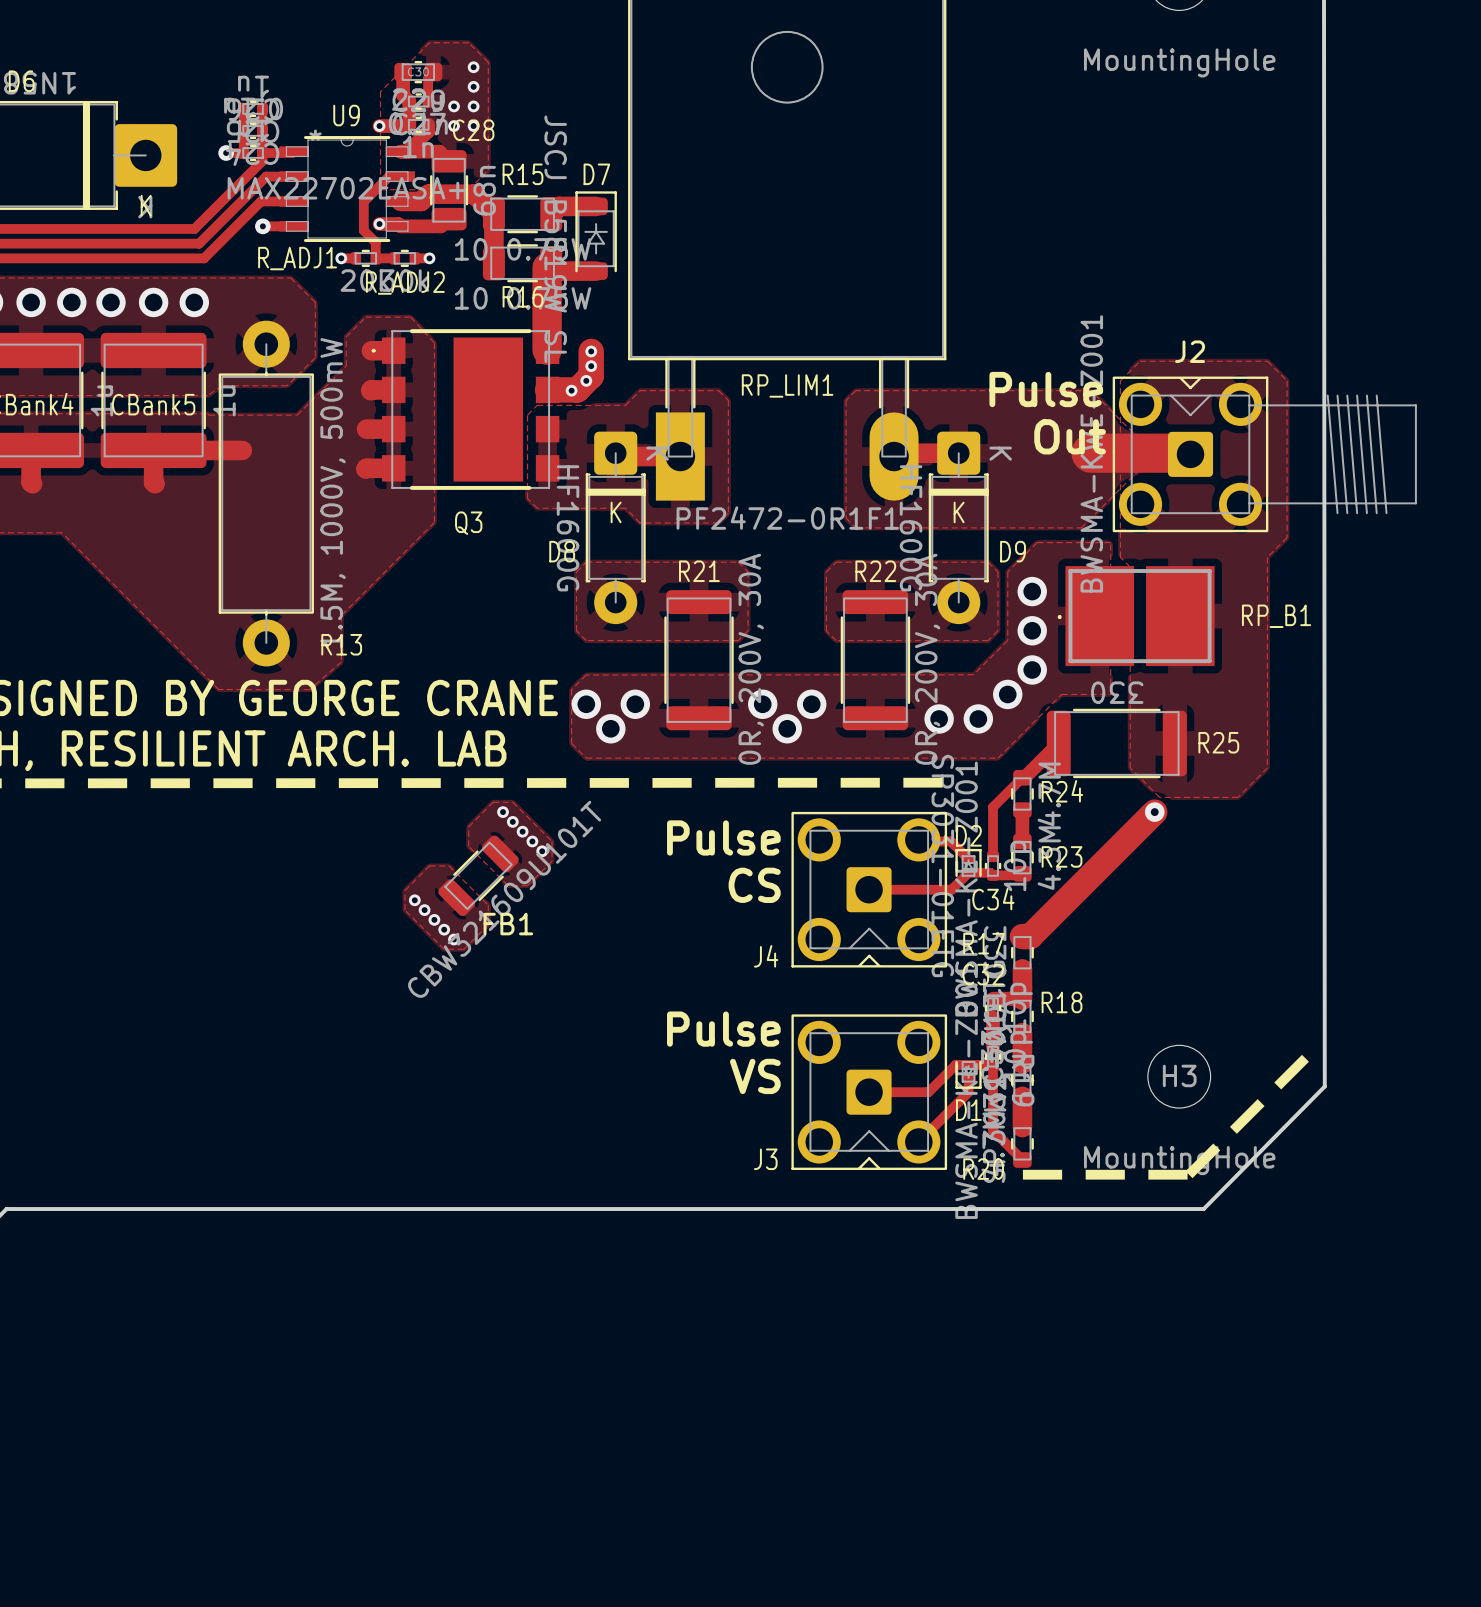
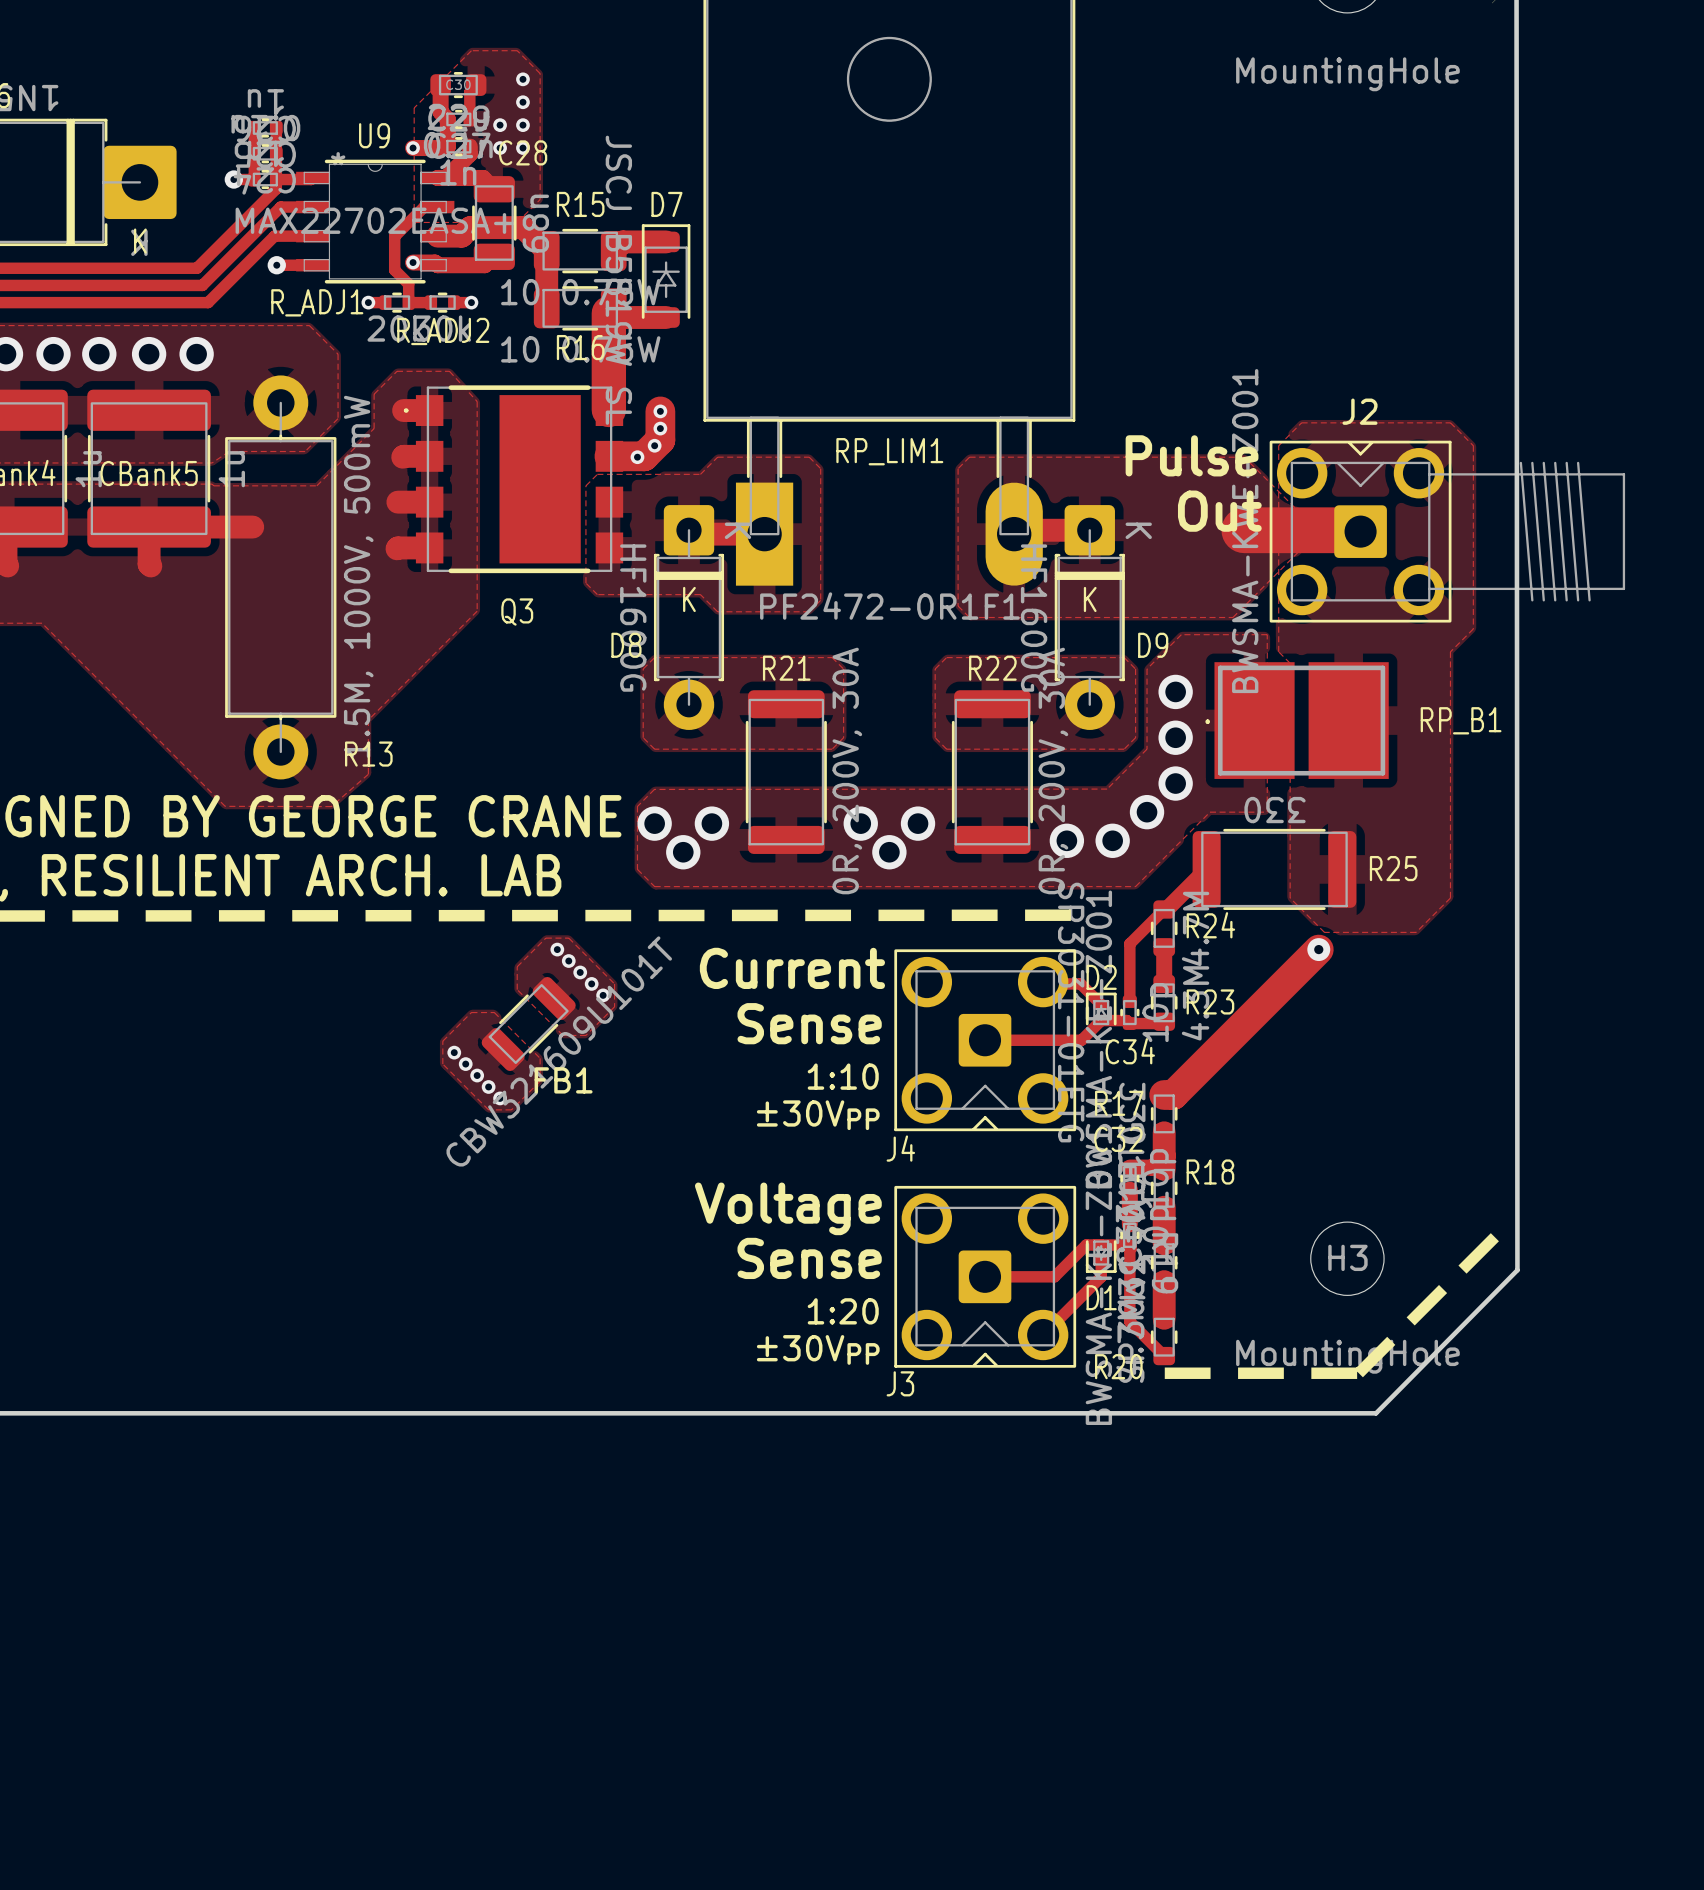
text: Pulse (723, 837) -> Current (792, 968)
text: CS (754, 885) -> Sense (809, 1023)
text: none -> 1:10 (843, 1076)
text: none -> ±30VPP (818, 1115)
J4 name position: J4 (766, 956) -> J4 (900, 1148)
text: Pulse (723, 1029) -> Voltage (788, 1208)
text: VS (755, 1076) -> Sense (809, 1258)
text: none -> 1:20 (843, 1311)
text: none -> ±30VPP (818, 1349)
J3 name position: J3 (765, 1159) -> J3 (900, 1383)

